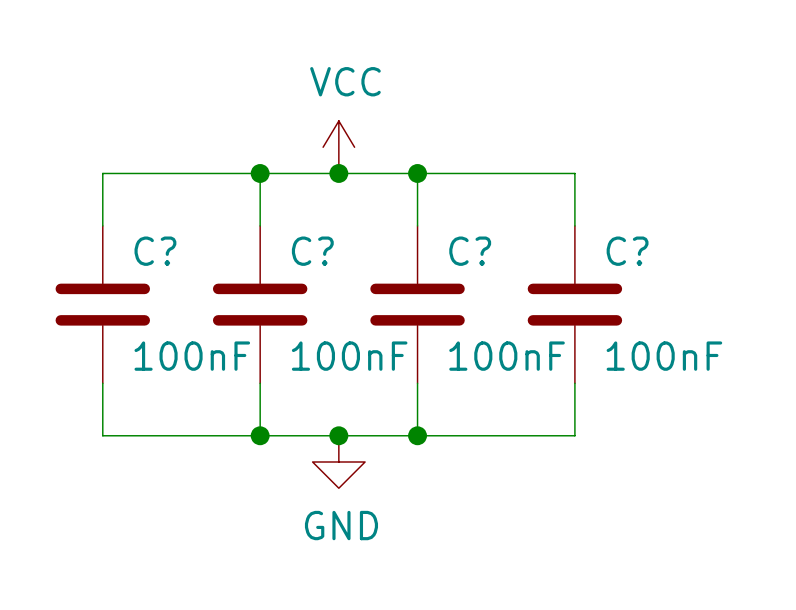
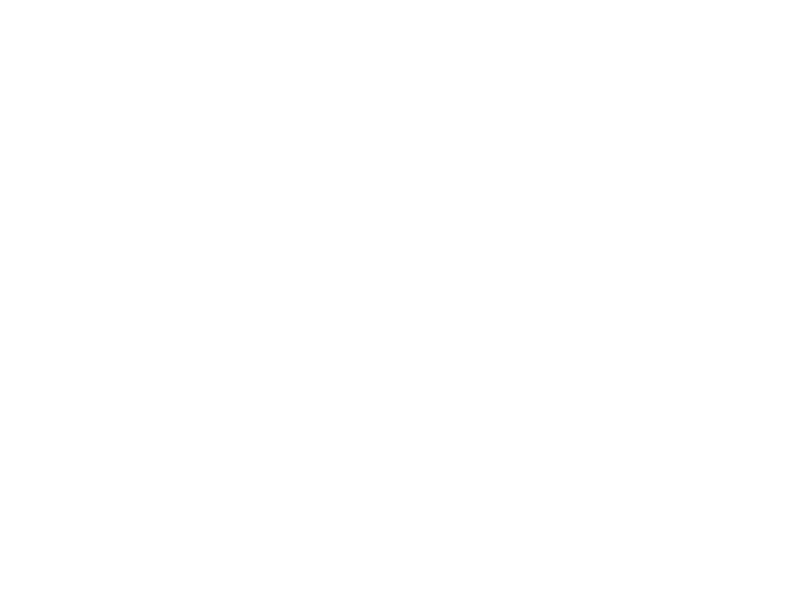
power symbol: VCC (338, 147) -> none
wire: (260, 173) (260, 225) -> none
junction: (260, 173) -> none
junction: (338, 173) -> none
wire: (417, 173) (417, 225) -> none
junction: (417, 173) -> none
wire: (102, 225) (102, 173) (574, 173) (574, 225) -> none
C?: 100nF (102, 304) -> none
C?: 100nF (260, 304) -> none
C?: 100nF (417, 304) -> none
C?: 100nF (574, 304) -> none
wire: (102, 383) (102, 435) (574, 435) (574, 383) -> none
wire: (260, 383) (260, 435) -> none
wire: (417, 383) (417, 435) -> none
junction: (260, 435) -> none
junction: (338, 435) -> none
junction: (417, 435) -> none
power symbol: GND (338, 462) -> none

